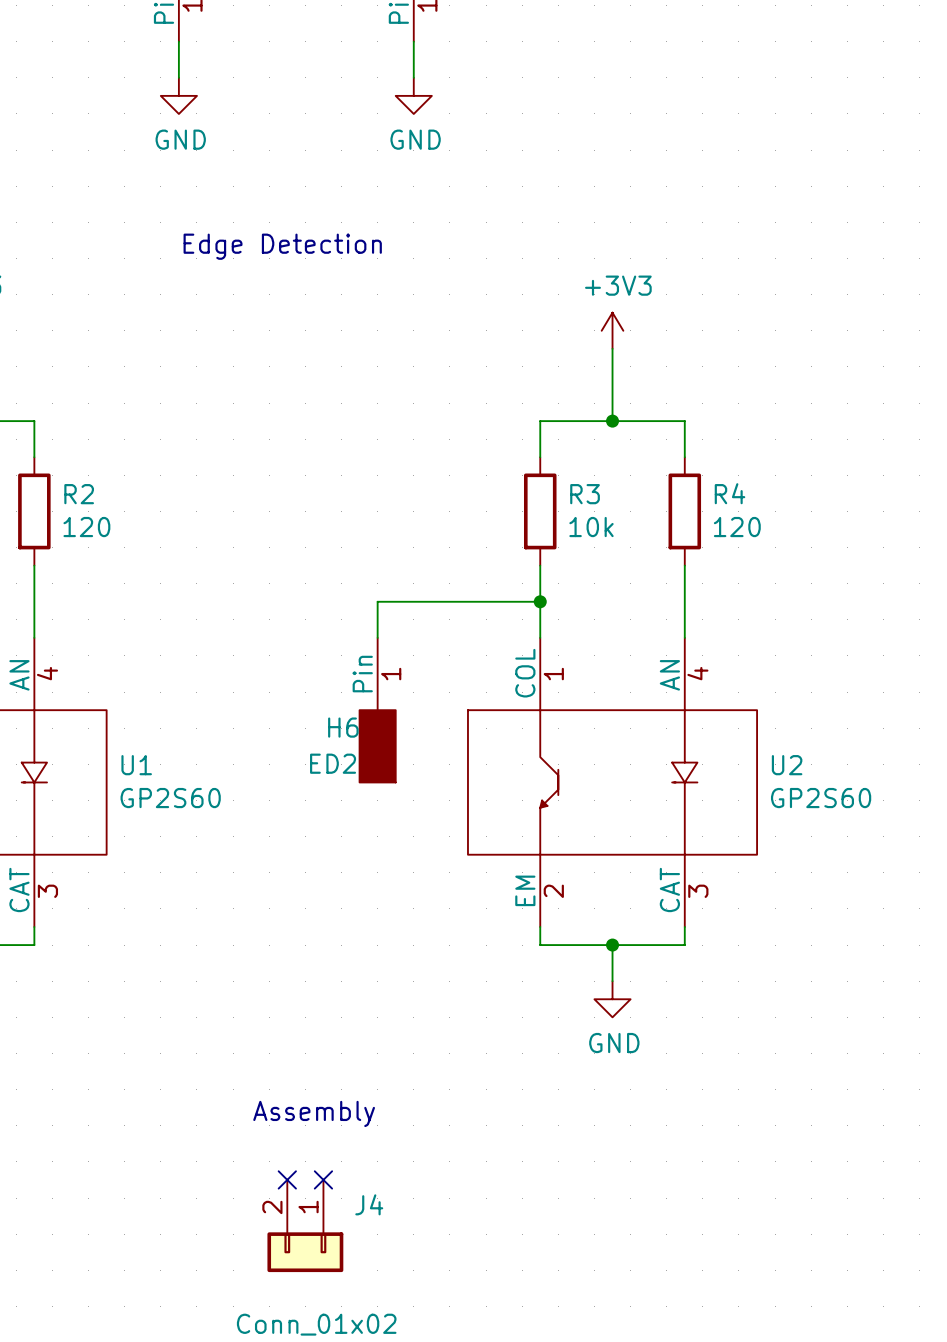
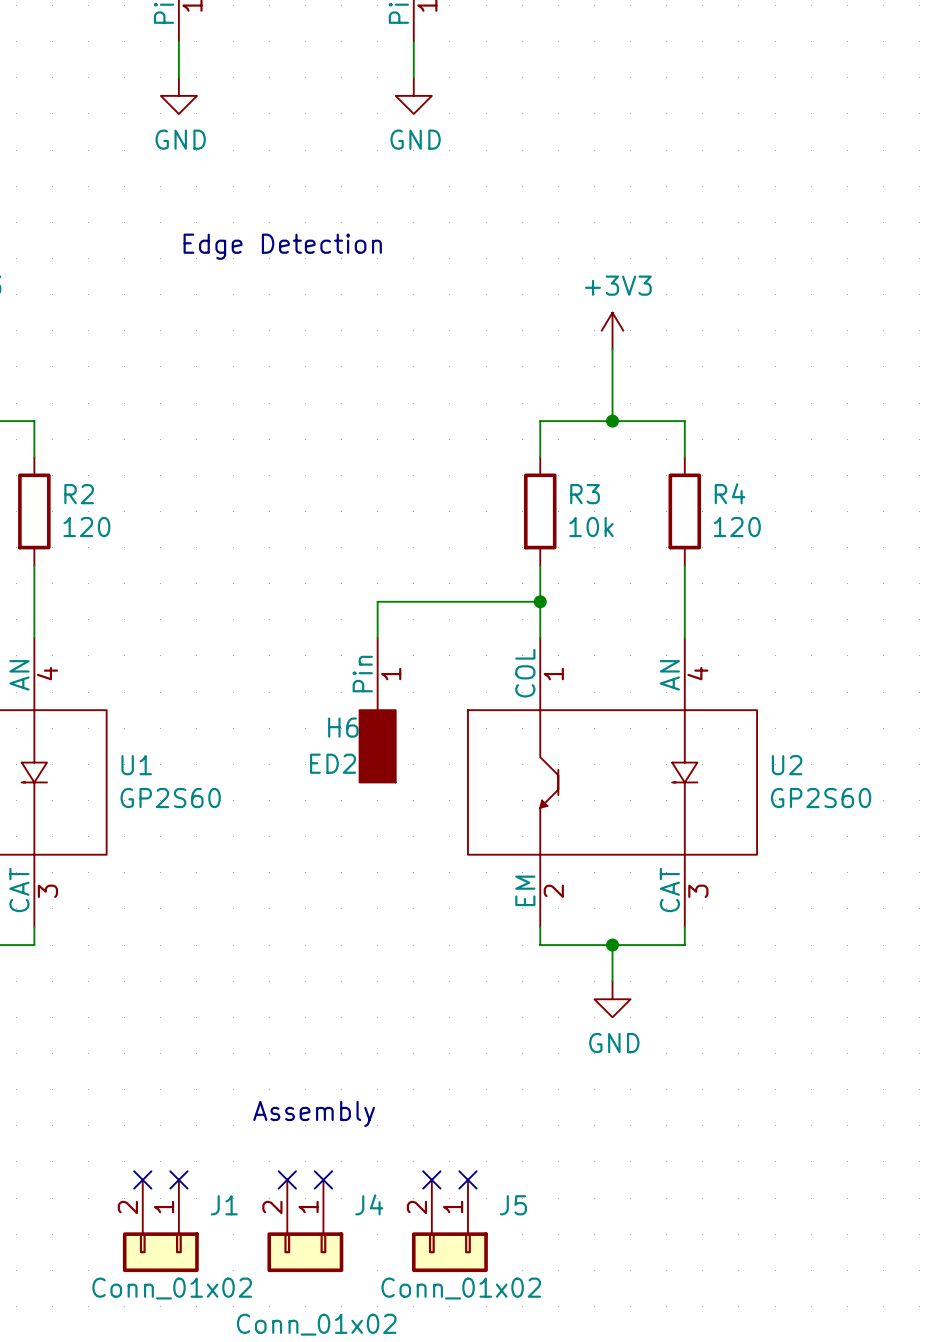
no-connect mark: none -> (142, 1179)
no-connect mark: none -> (178, 1179)
no-connect mark: none -> (431, 1179)
no-connect mark: none -> (467, 1179)
J1: none -> Conn_01x02 (160, 1226)
J5: none -> Conn_01x02 (449, 1226)

